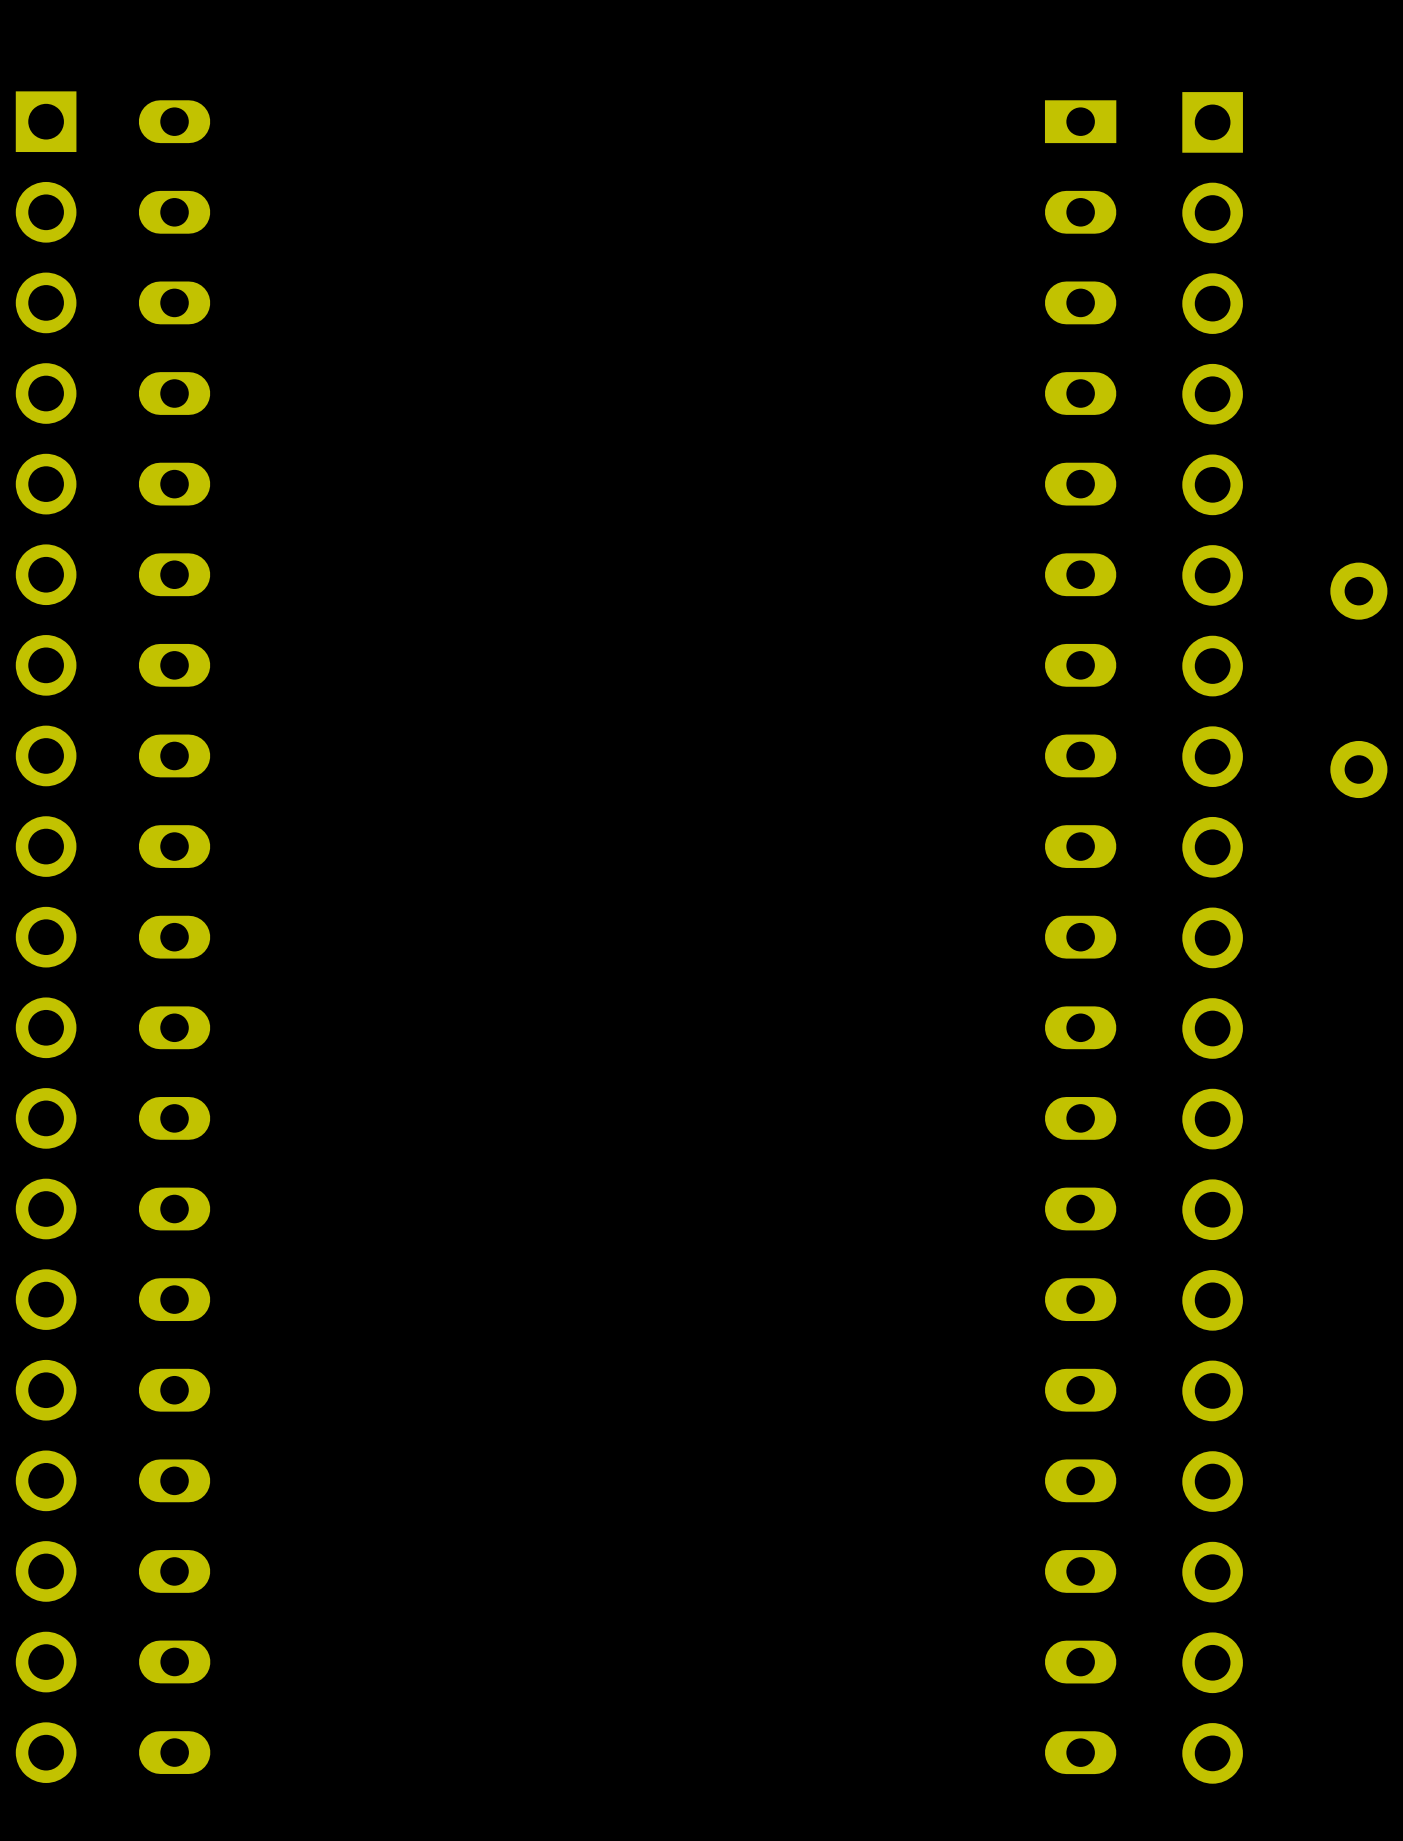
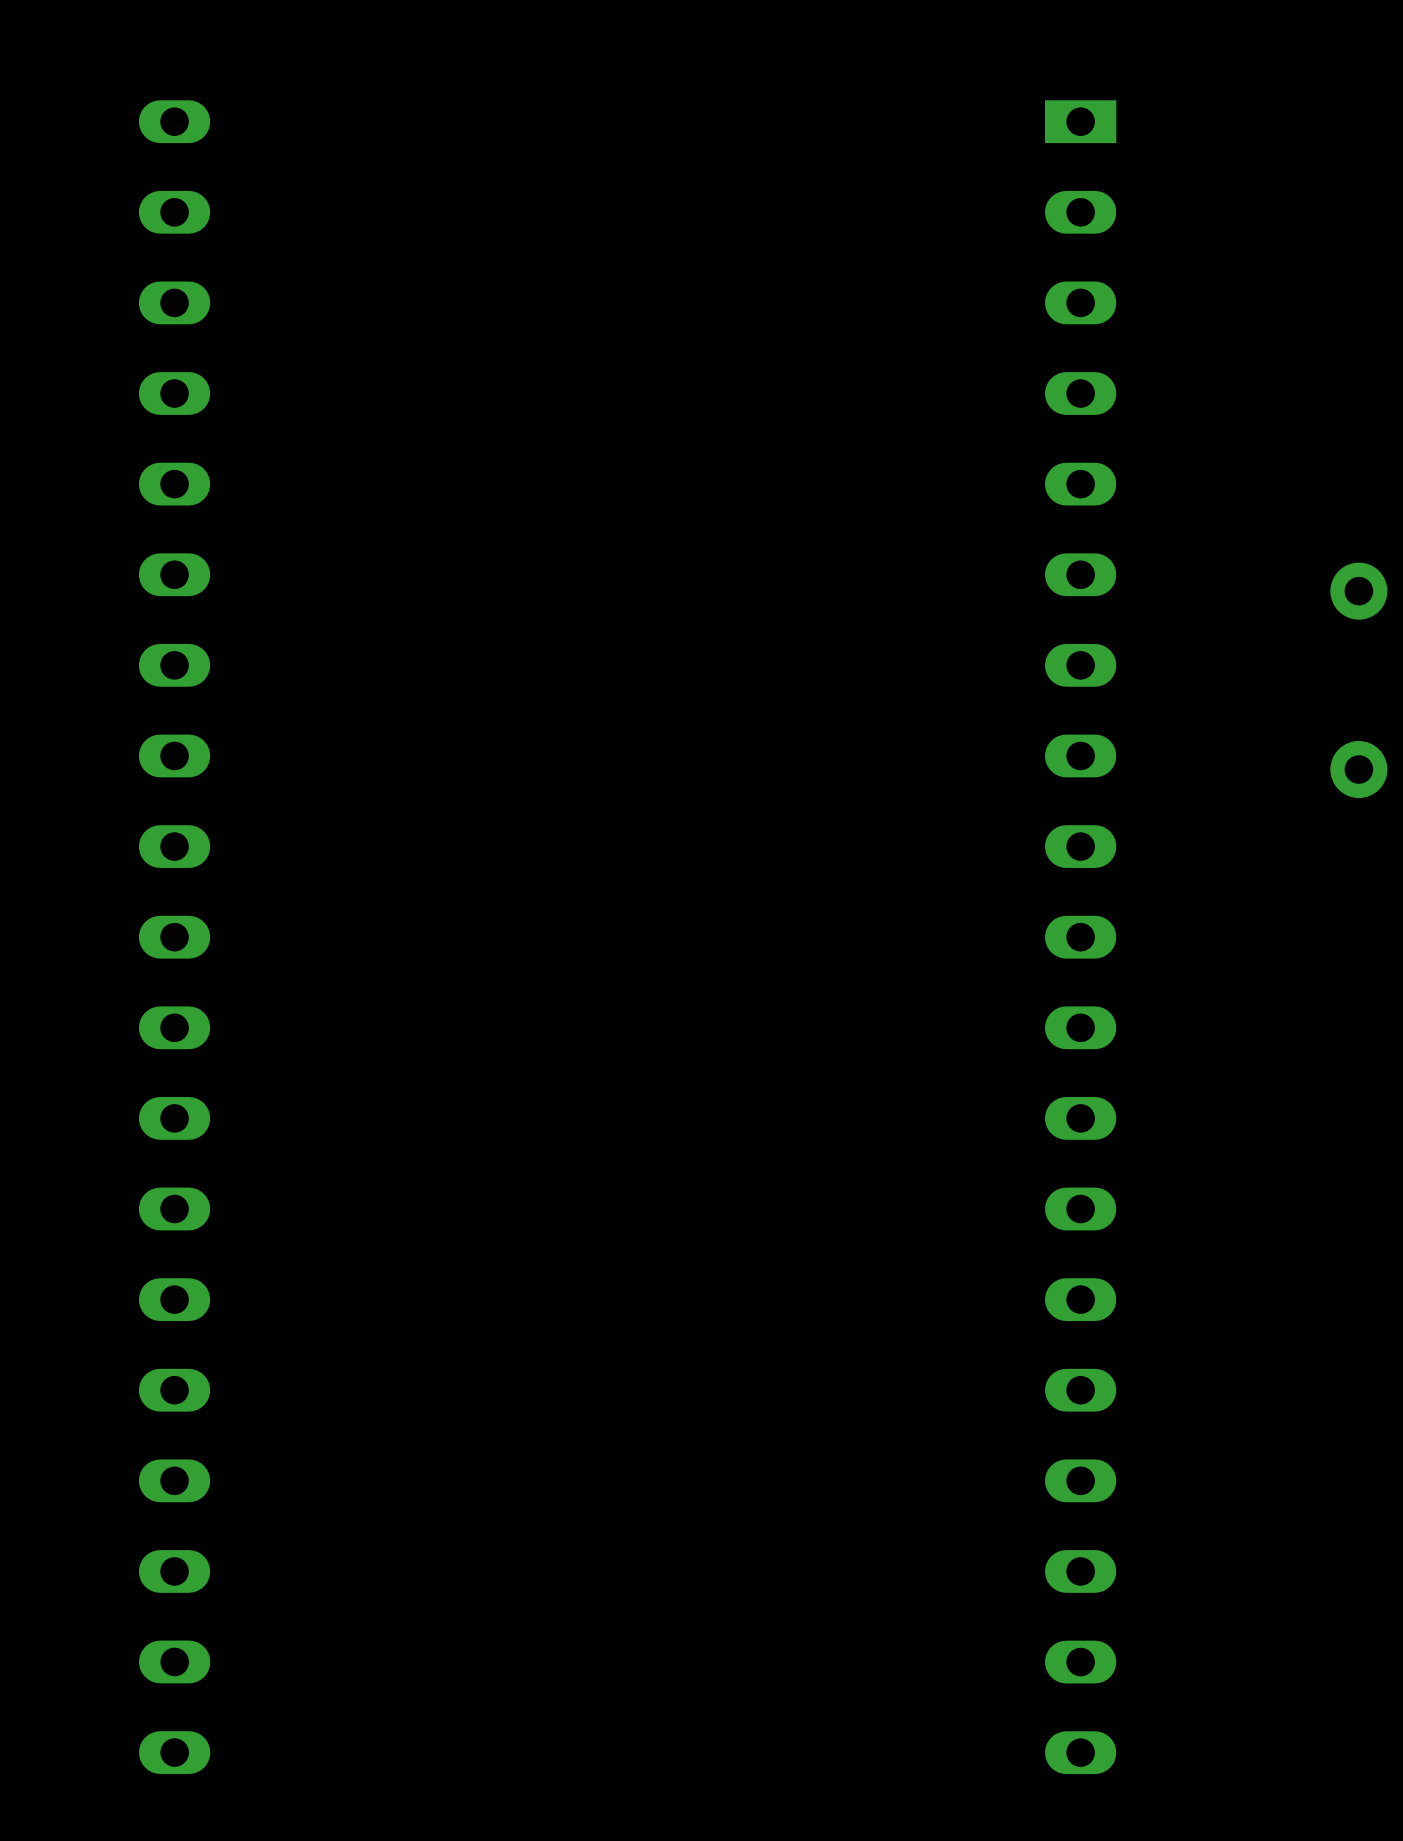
part: (46, 937) -> none
part: (1212, 937) -> none

